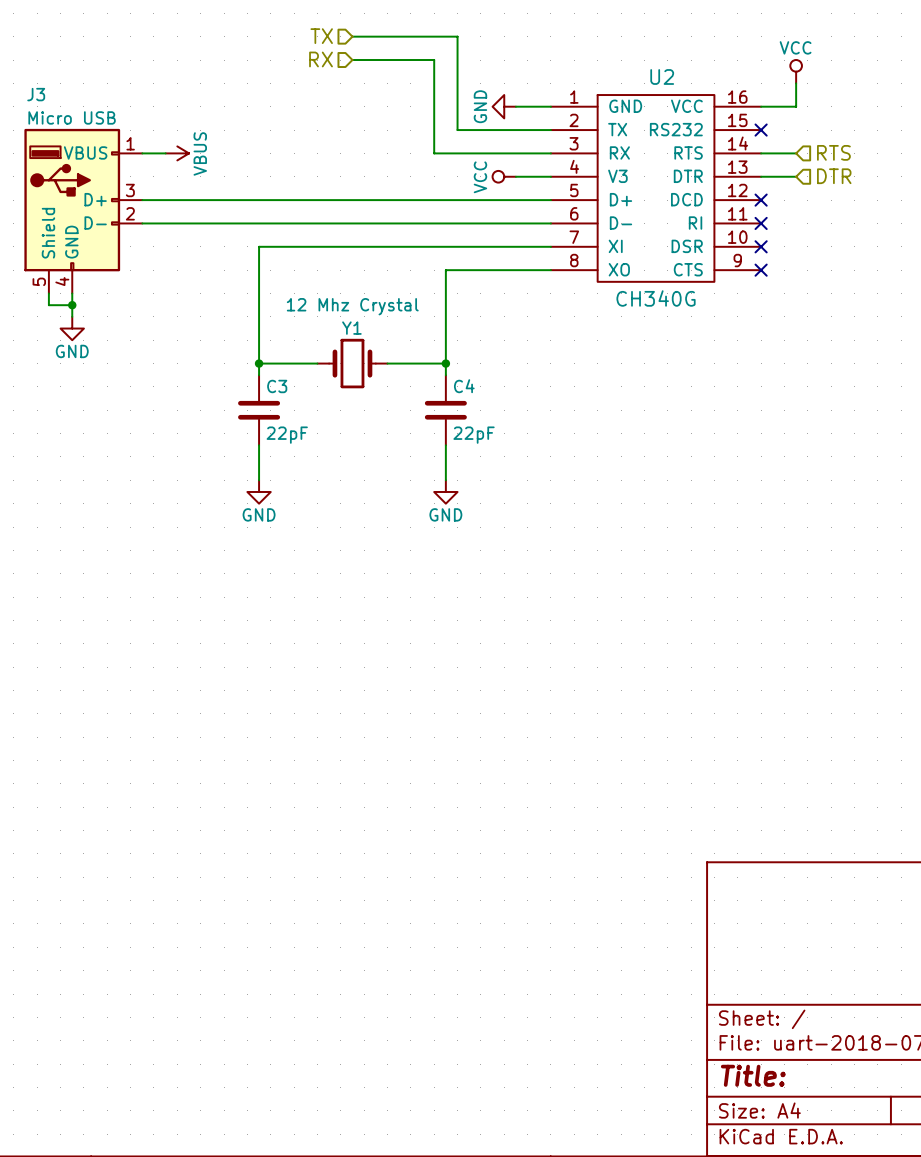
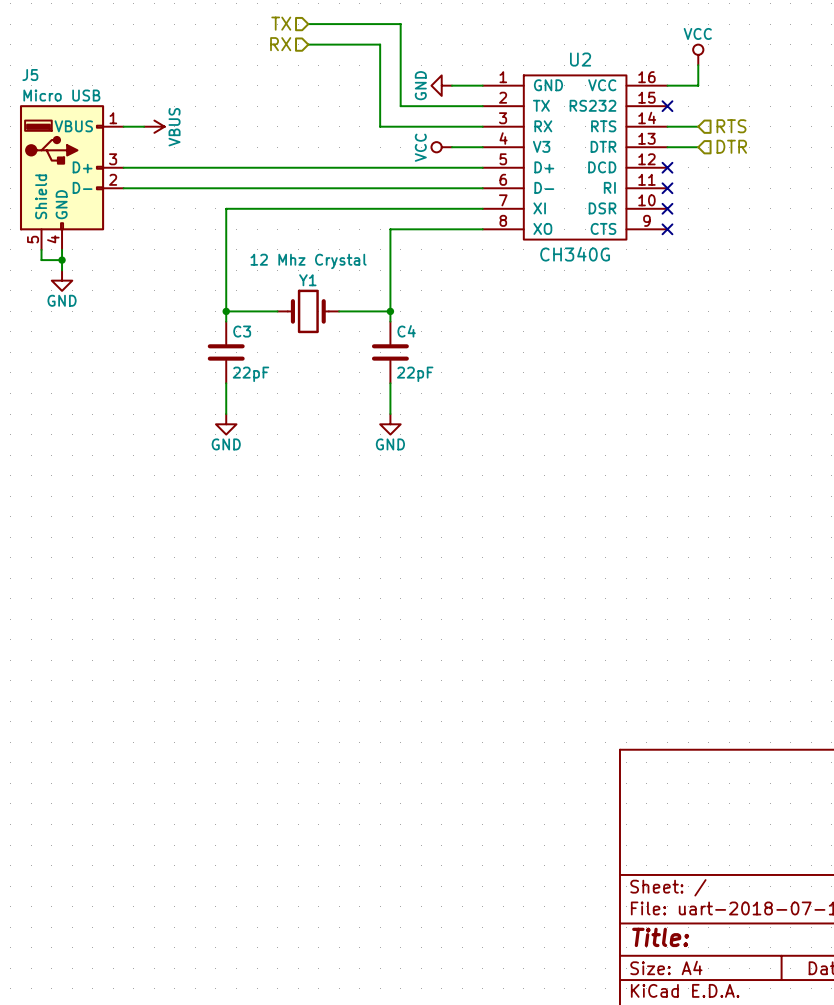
J3 name: J3 (36, 94) -> J5 (30, 75)

